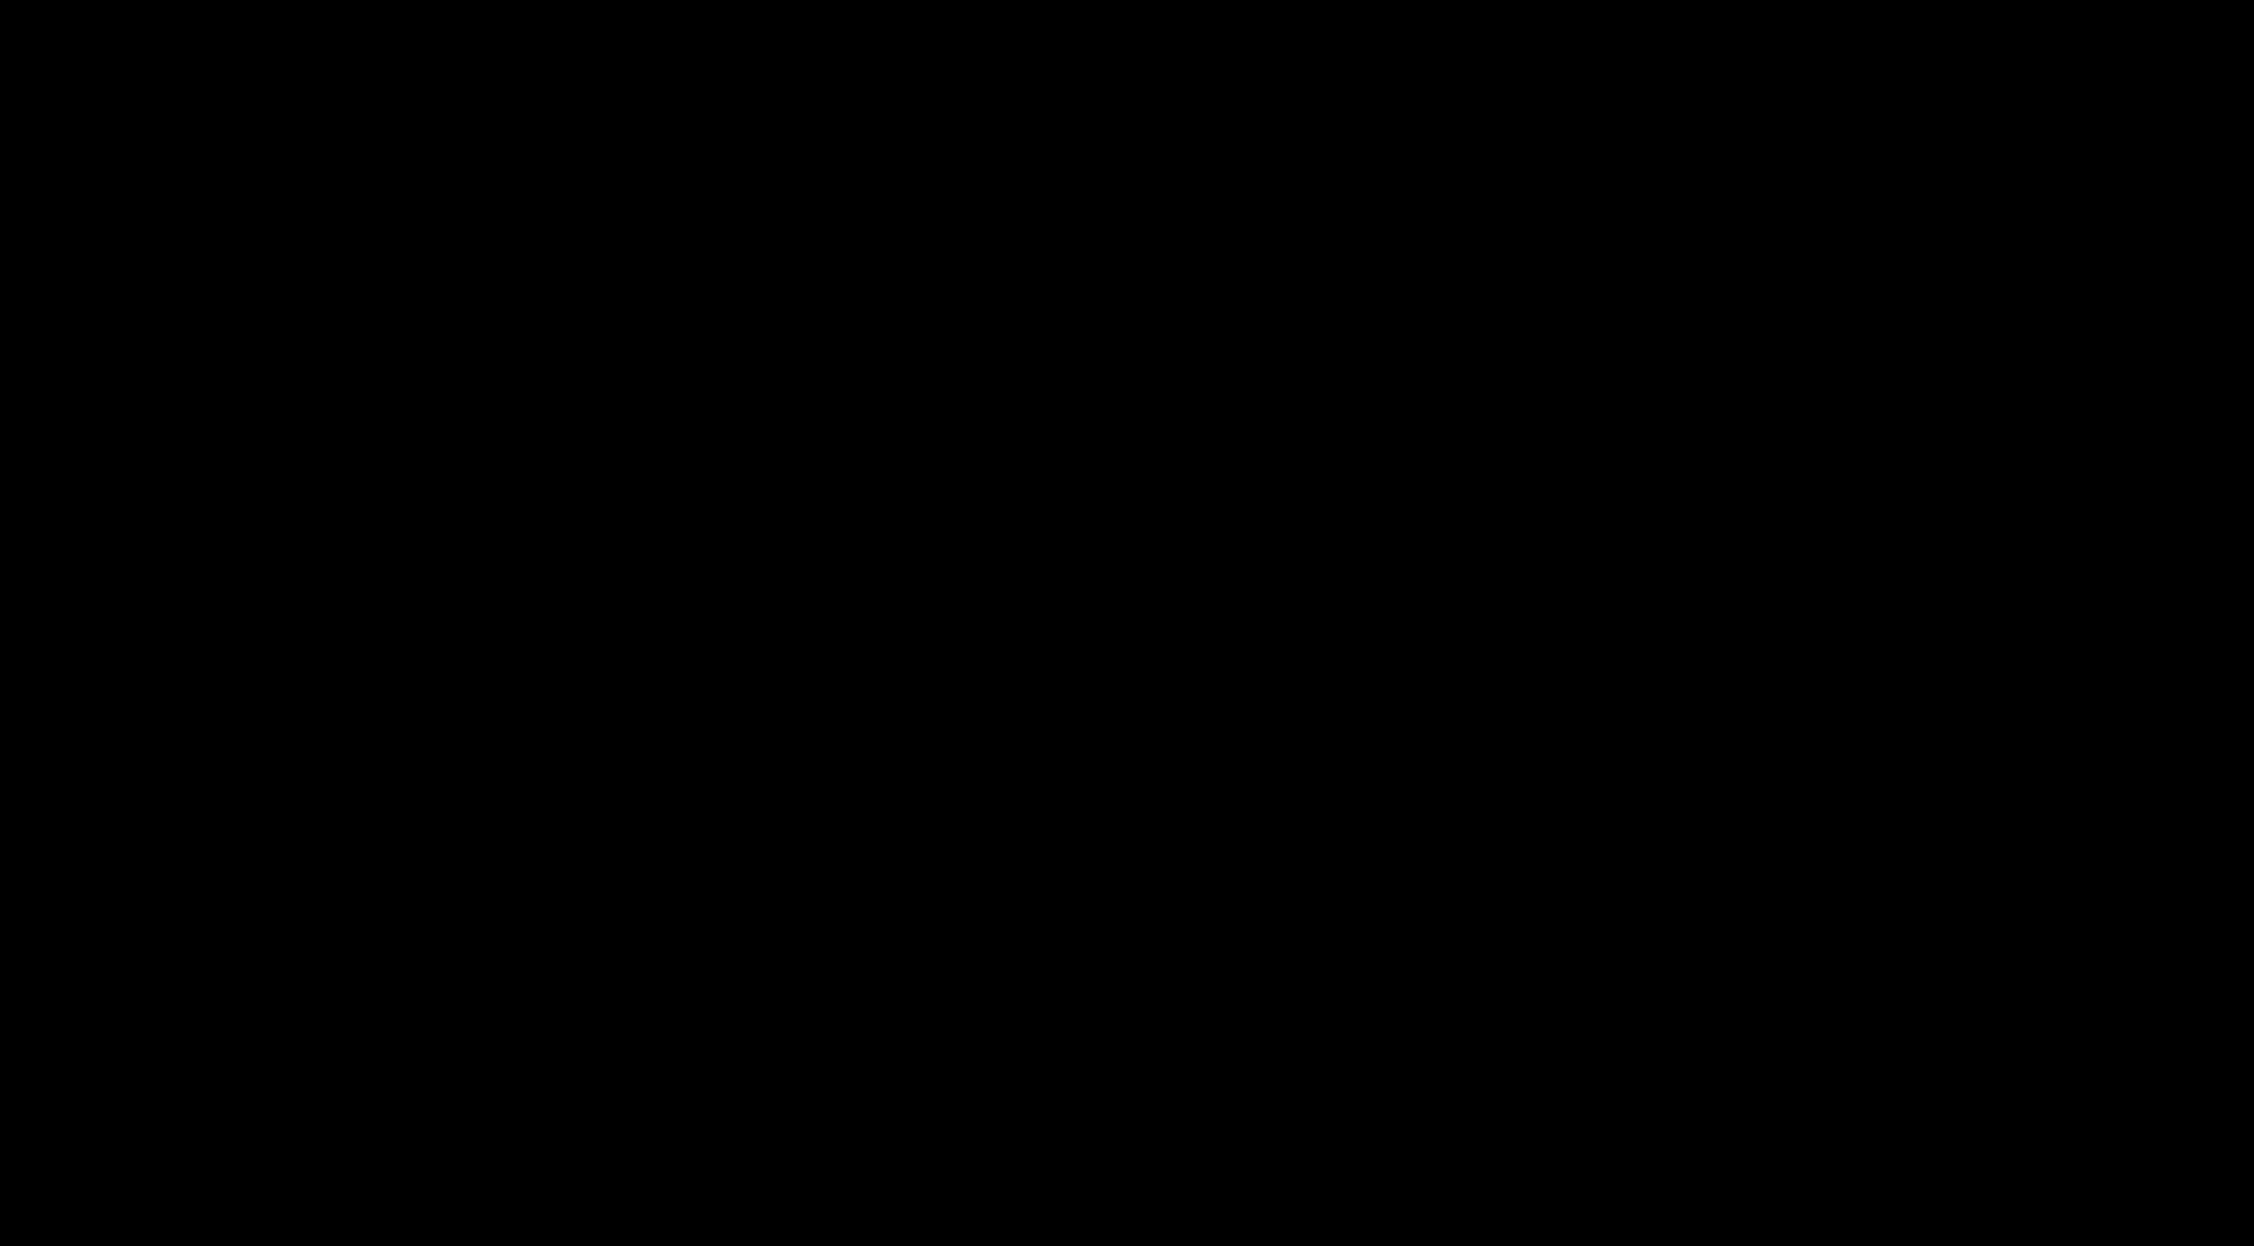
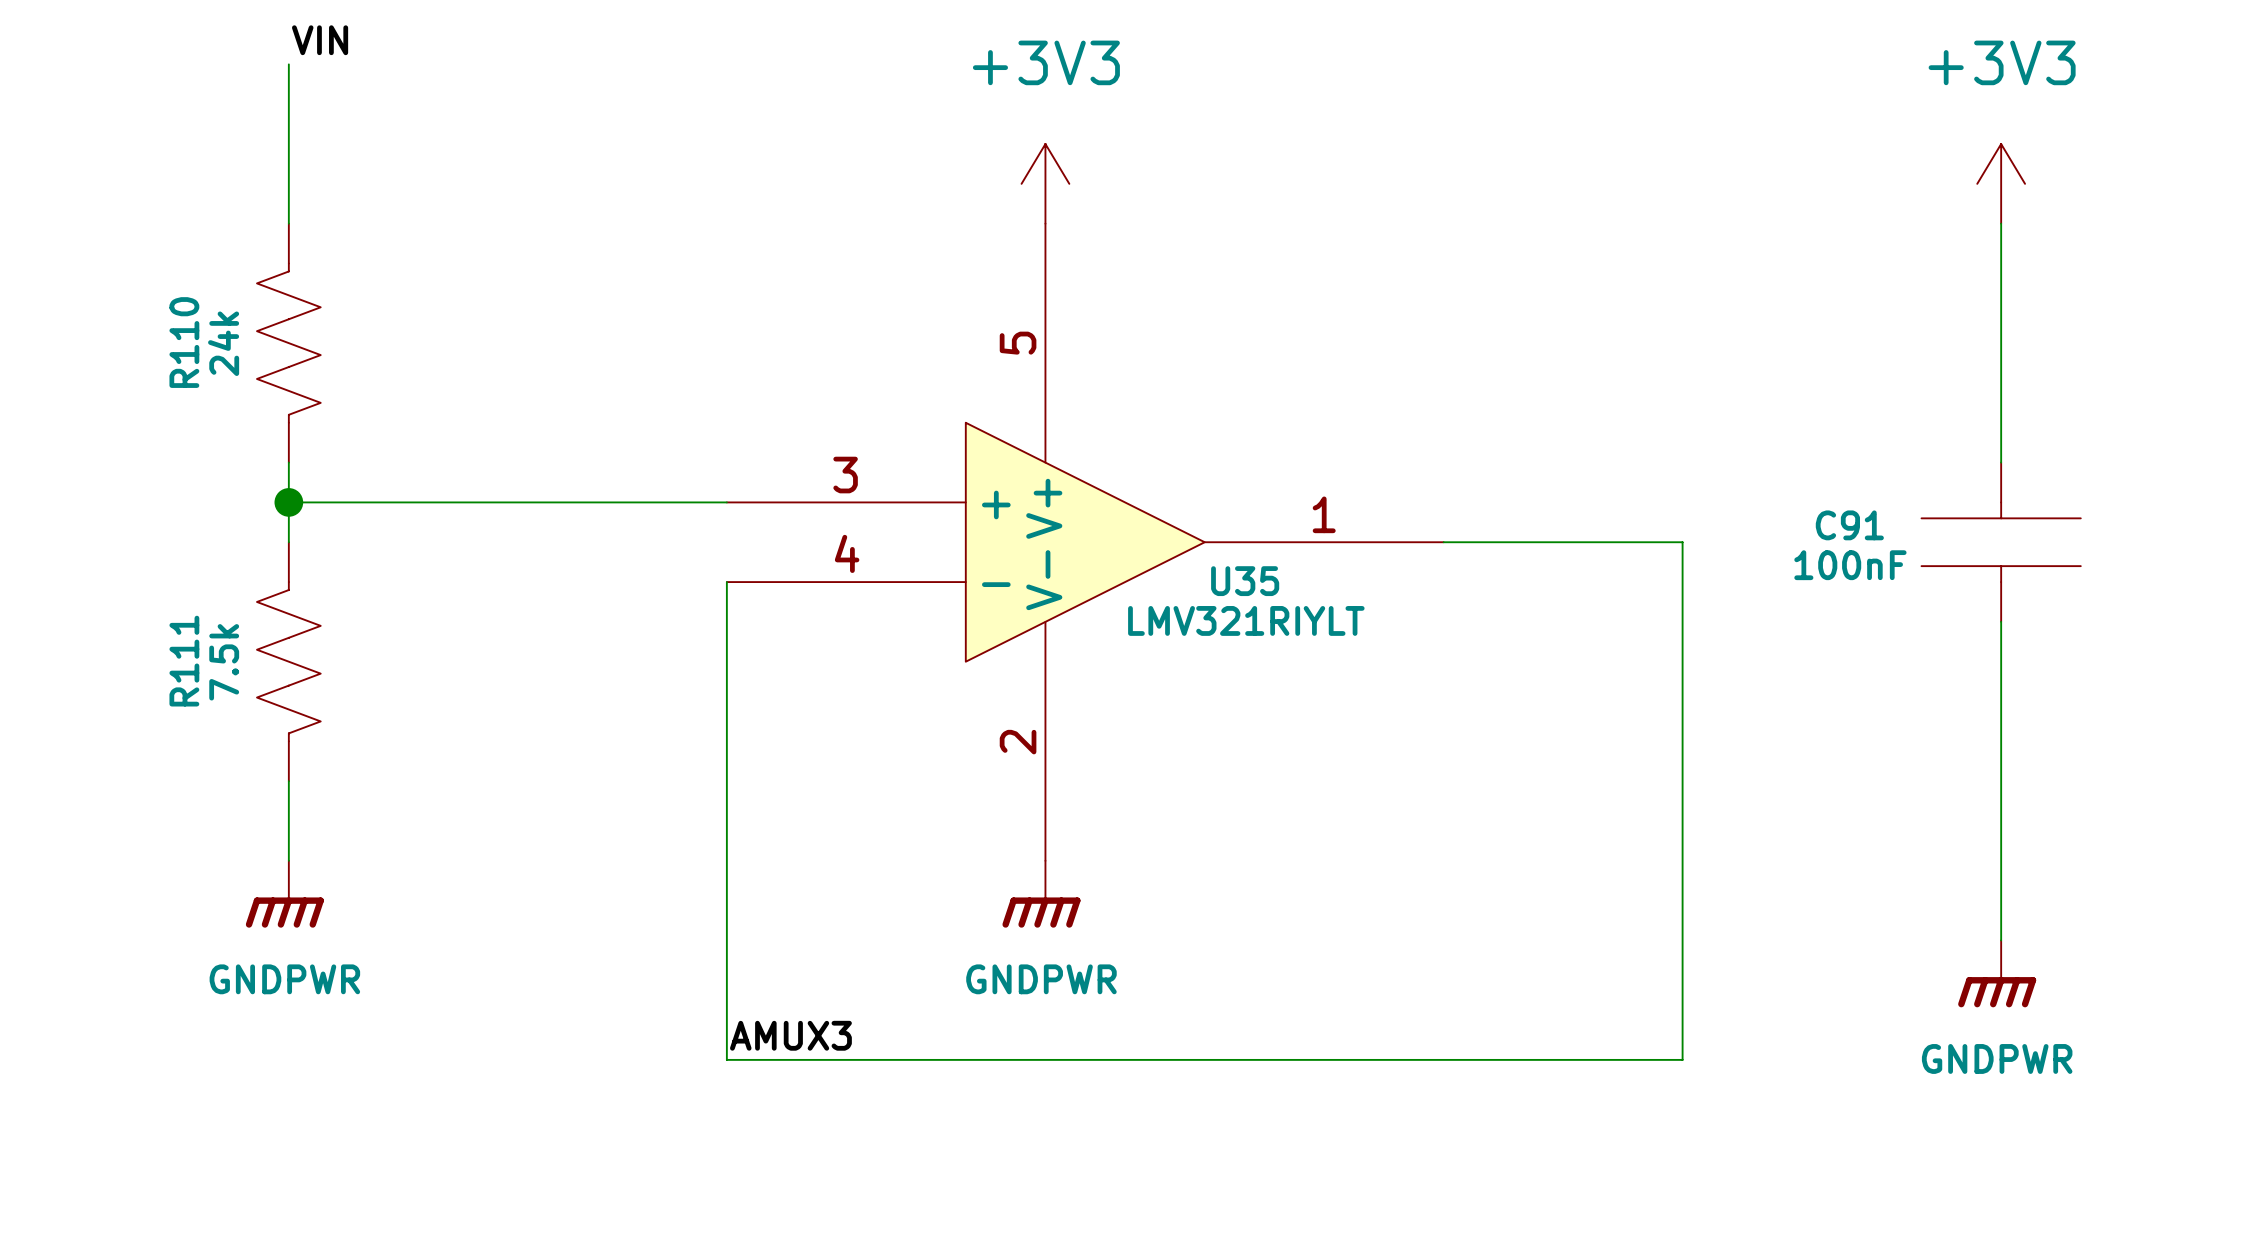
label: none -> VIN (320, 40)
wire: none -> (288, 64) (288, 223)
power symbol: none -> +3V3 (1045, 183)
power symbol: none -> +3V3 (2001, 183)
wire: none -> (2001, 223) (2001, 462)
R110: none -> 24k (288, 343)
wire: none -> (288, 462) (288, 542)
wire: none -> (288, 502) (726, 502)
junction: none -> (288, 502)
U35: none -> LMV321RIYLT (1085, 542)
wire: none -> (1443, 542) (1682, 542) (1682, 1059) (726, 1059) (726, 582)
C91: none -> 100nF (2001, 542)
wire: none -> (2001, 621) (2001, 940)
R111: none -> 7.5k (288, 661)
wire: none -> (288, 781) (288, 860)
power symbol: none -> GNDPWR (284, 894)
power symbol: none -> GNDPWR (1041, 894)
power symbol: none -> GNDPWR (1997, 973)
label: none -> AMUX3 (790, 1035)

